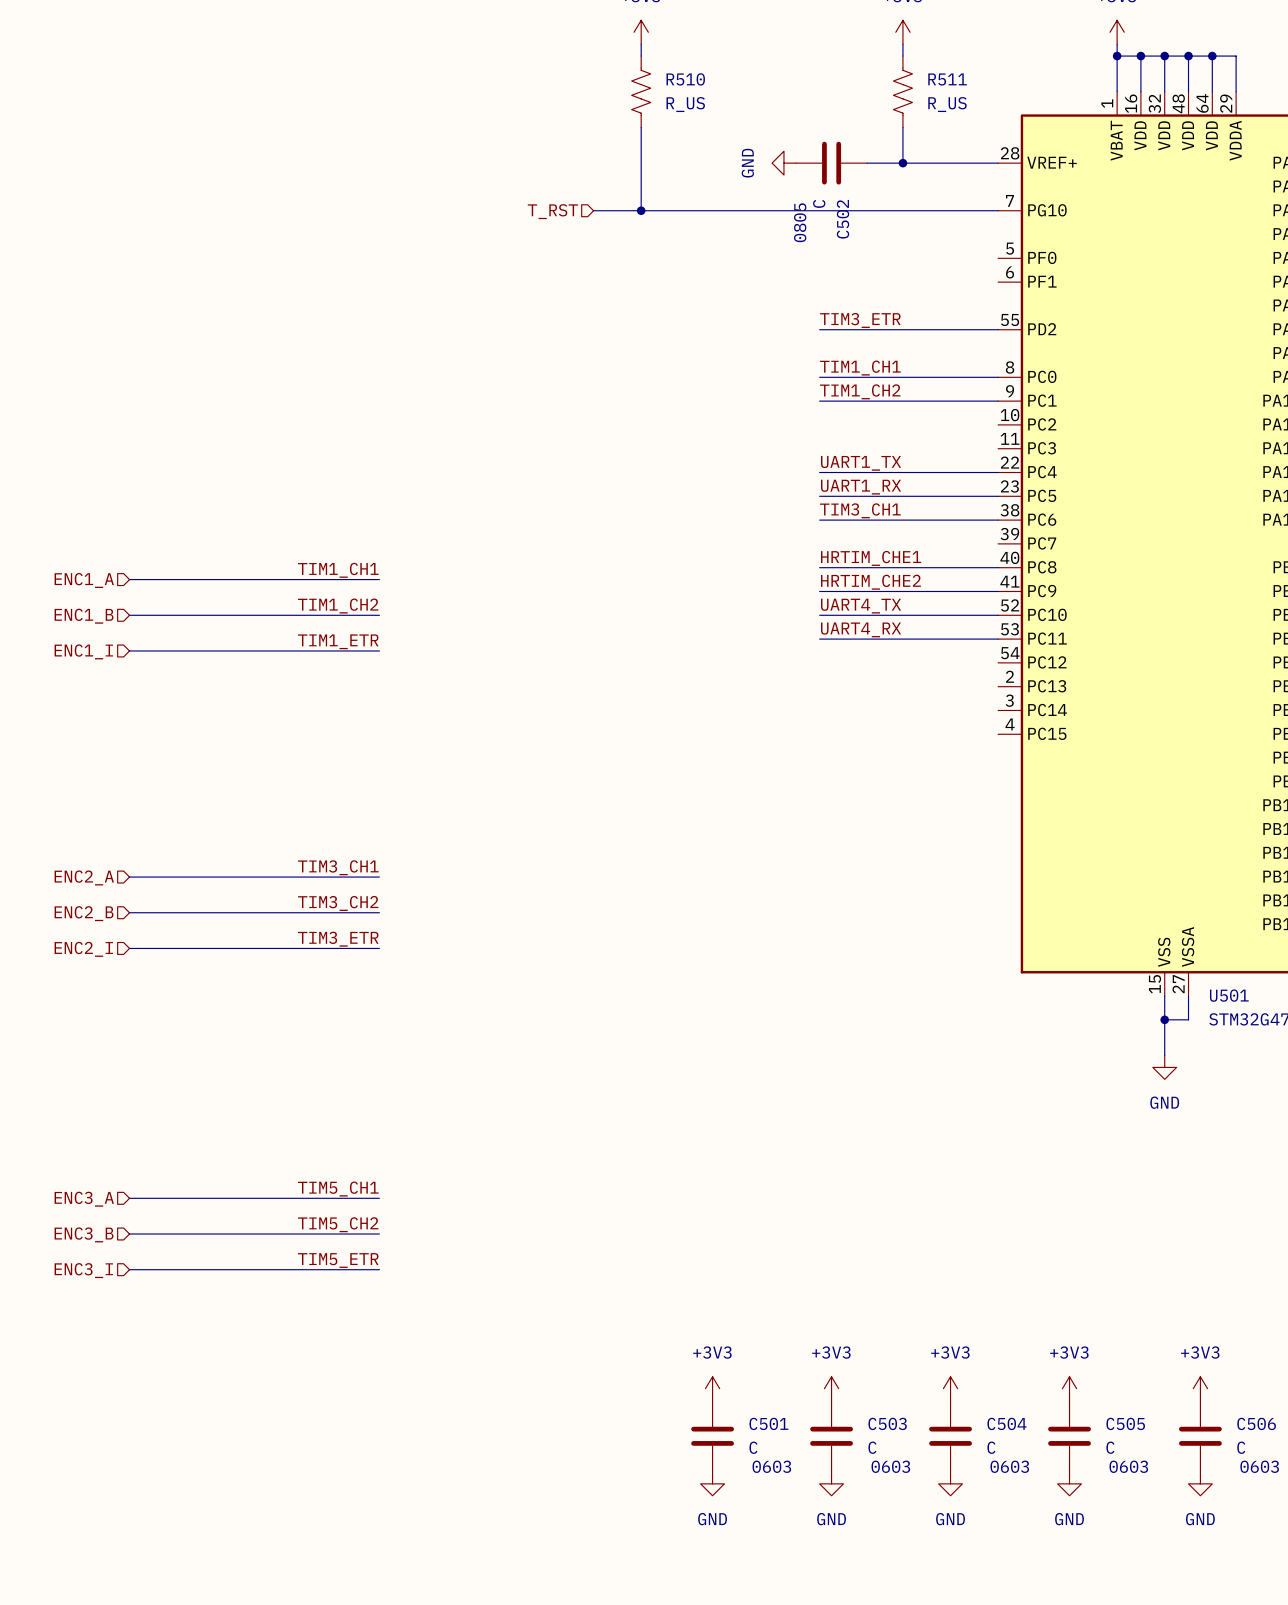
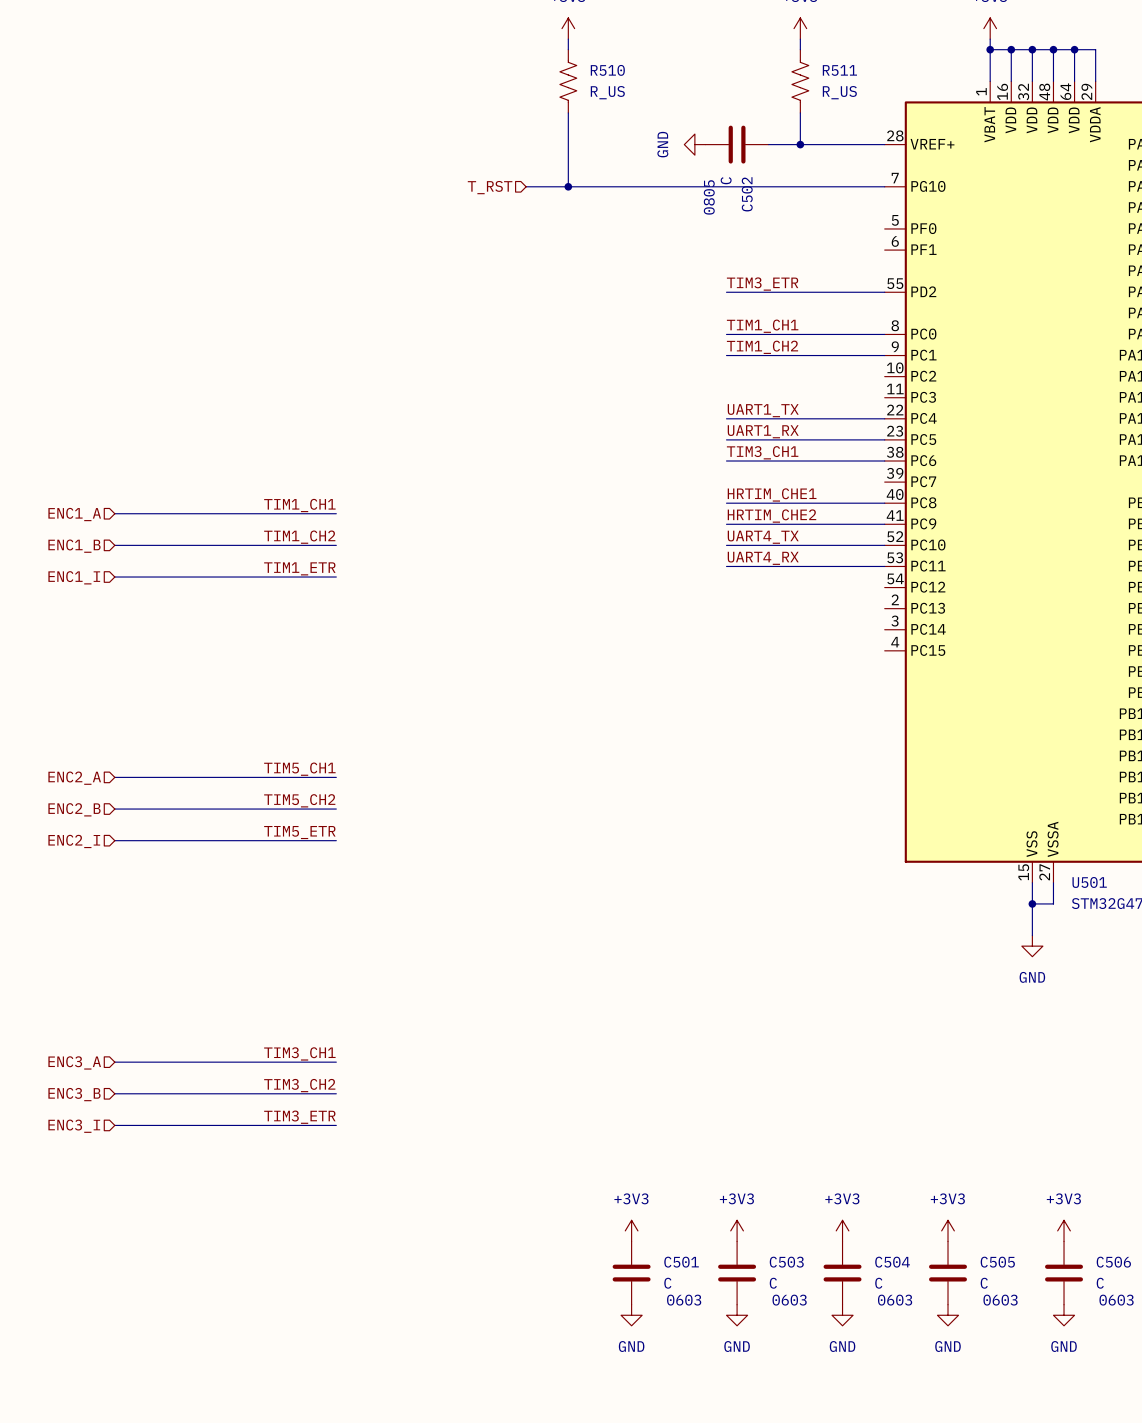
label: TIM3_CH1 (338, 867) -> TIM5_CH1 (299, 769)
label: TIM3_CH2 (338, 903) -> TIM5_CH2 (299, 800)
label: TIM3_ETR (338, 939) -> TIM5_ETR (299, 832)
label: TIM5_CH1 (338, 1189) -> TIM3_CH1 (299, 1053)
label: TIM5_CH2 (338, 1224) -> TIM3_CH2 (299, 1085)
label: TIM5_ETR (338, 1260) -> TIM3_ETR (299, 1117)

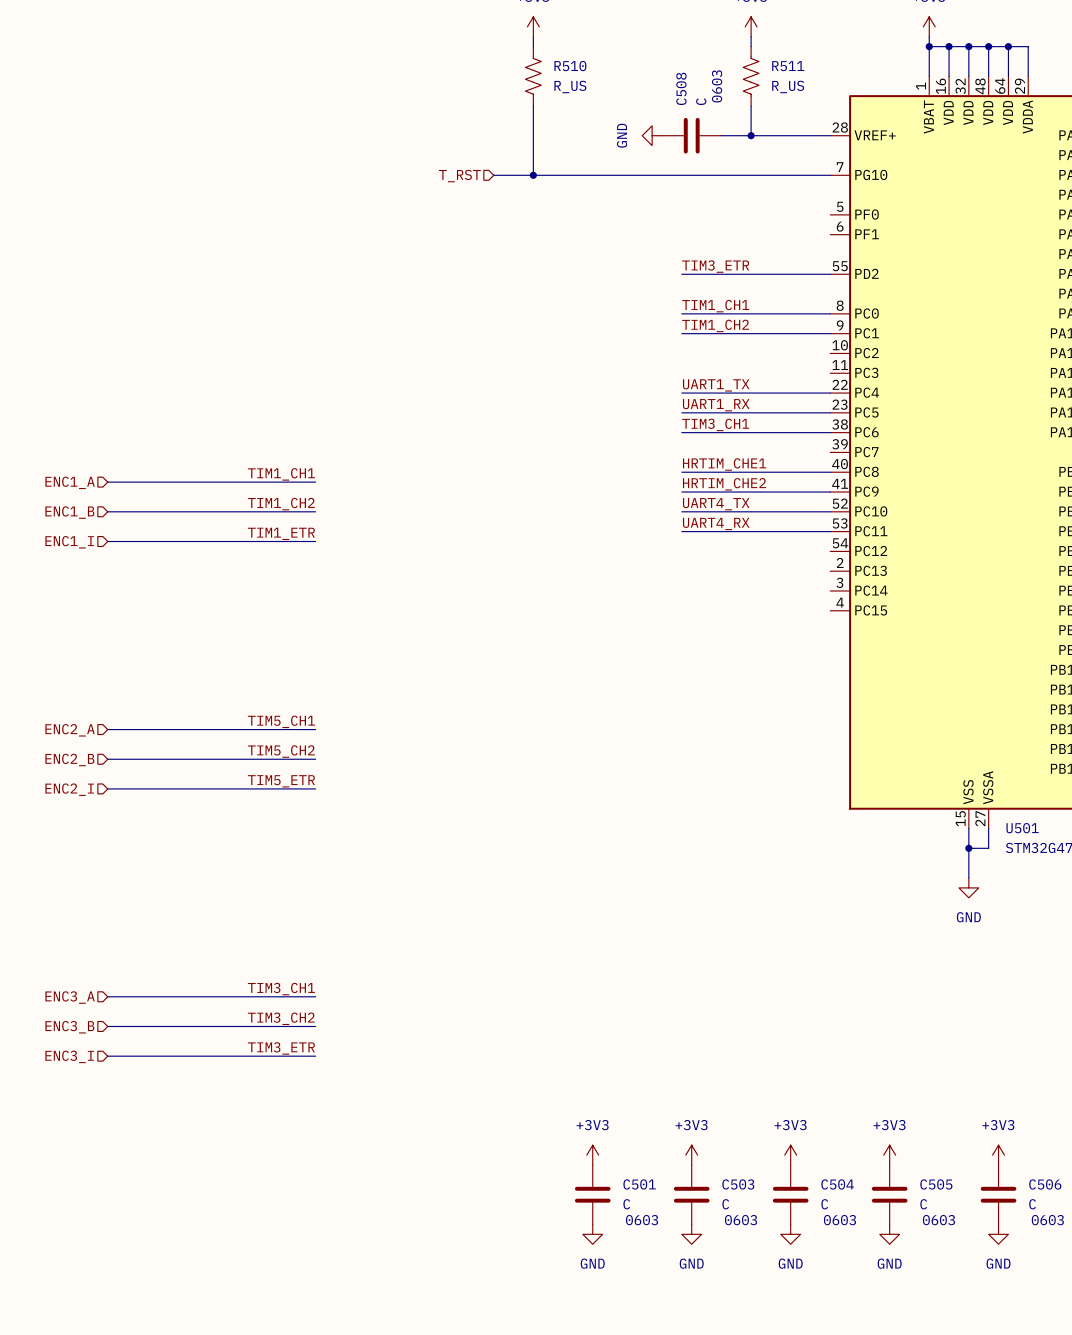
C502 value position: C (726, 180) -> C (701, 101)
C502 name: C502 (747, 194) -> C508 (681, 88)
C502 text: 0805 (709, 197) -> 0603 (717, 86)

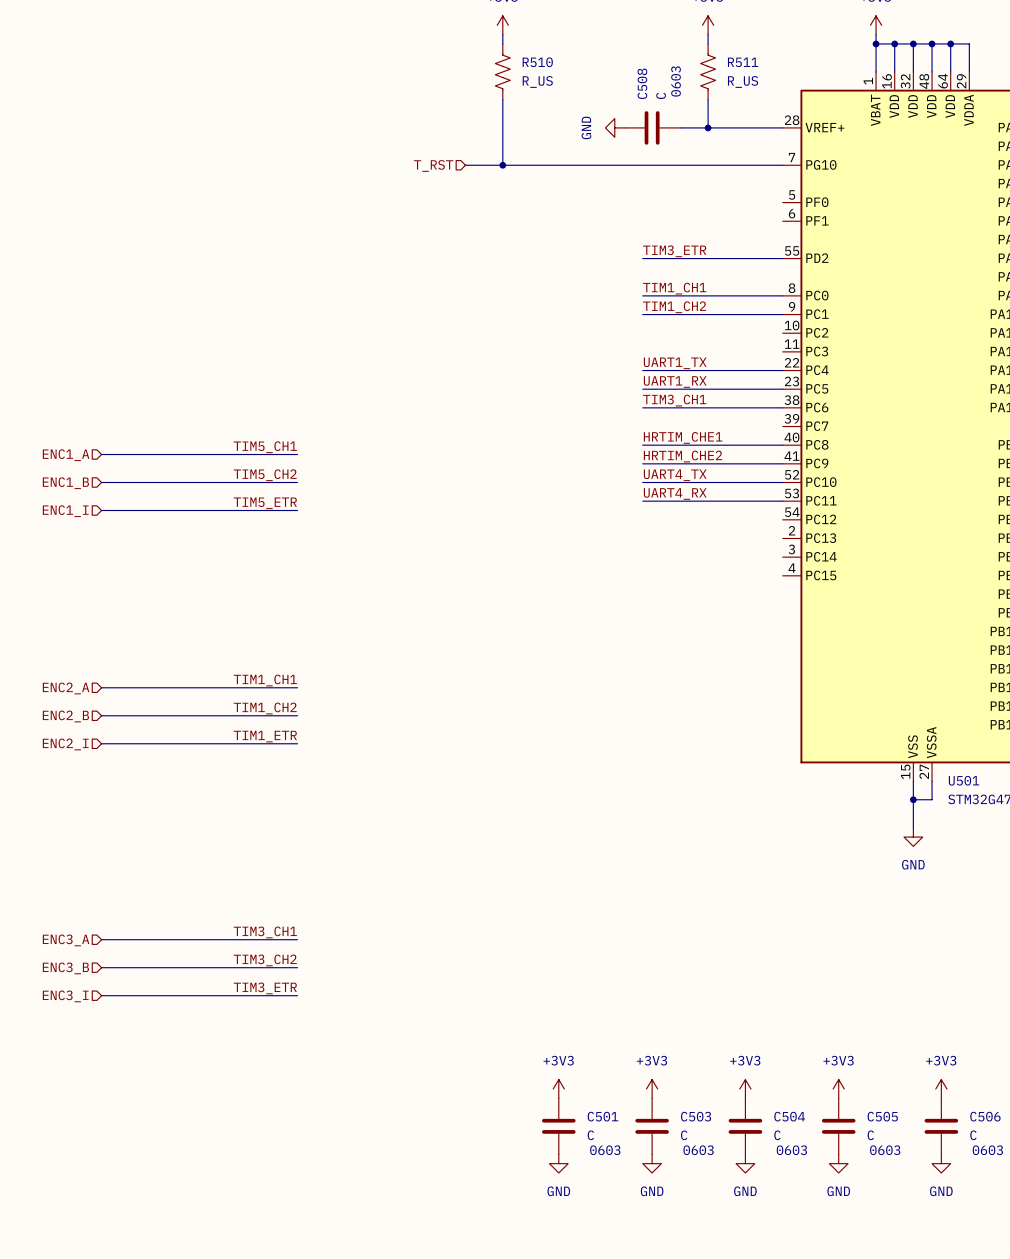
label: TIM1_CH1 (281, 474) -> TIM5_CH1 (265, 447)
label: TIM1_CH2 (281, 504) -> TIM5_CH2 (265, 475)
label: TIM1_ETR (281, 533) -> TIM5_ETR (265, 503)
label: TIM5_CH1 (281, 721) -> TIM1_CH1 (265, 680)
label: TIM5_CH2 (281, 751) -> TIM1_CH2 (265, 708)
label: TIM5_ETR (281, 781) -> TIM1_ETR (265, 736)

